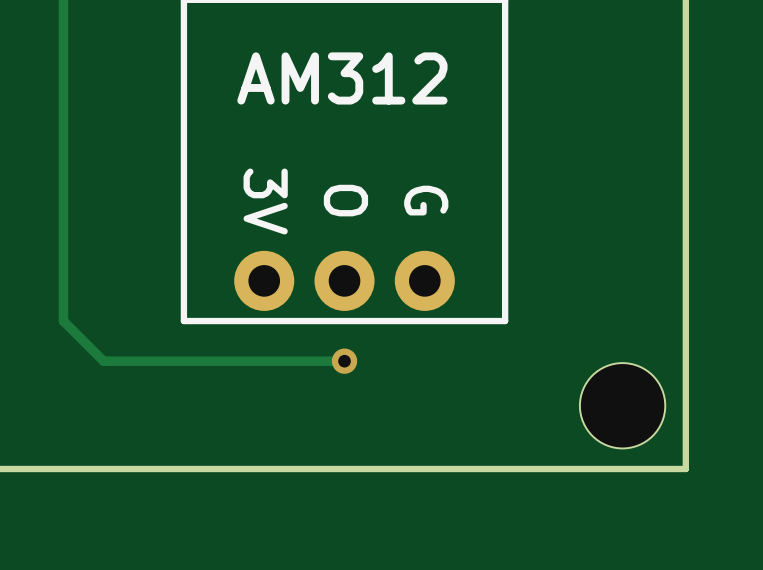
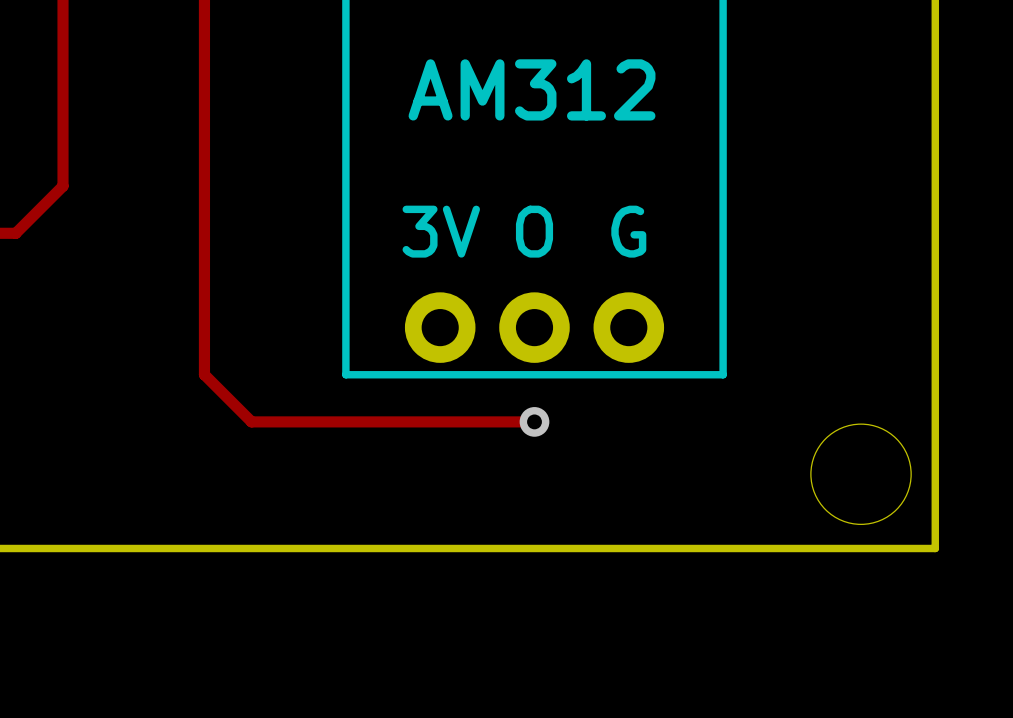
text rotation: 0° (345, 200) -> 90° counterclockwise (534, 231)
text rotation: 0° (426, 200) -> 90° counterclockwise (628, 231)
text rotation: 0° (265, 201) -> 90° counterclockwise (441, 231)

